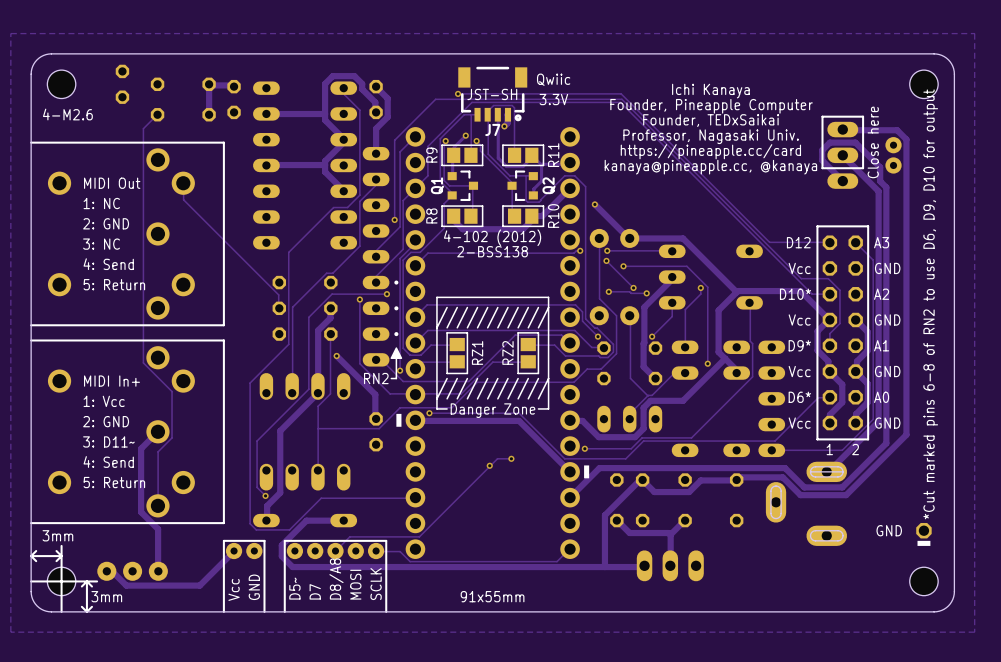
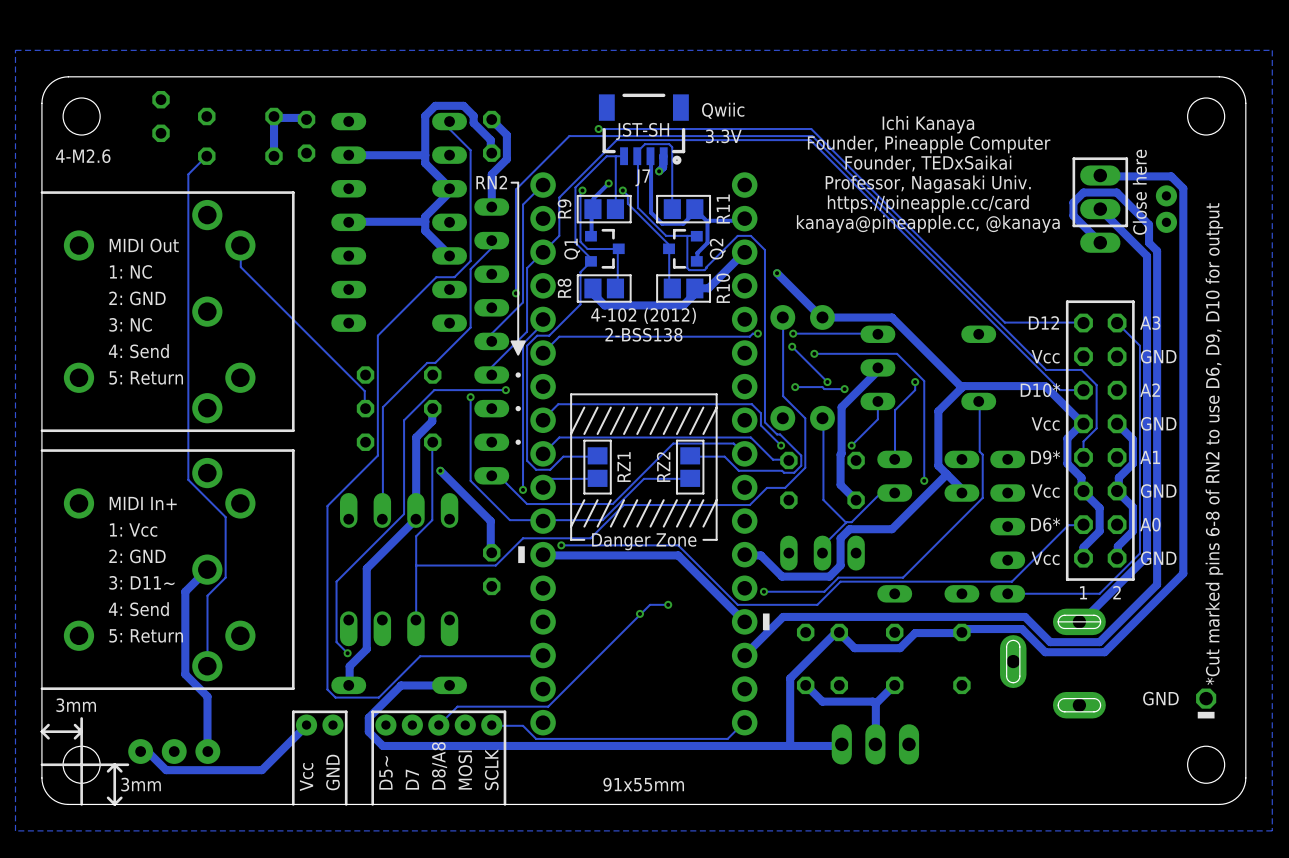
line: none -> (511, 182) (518, 182) (518, 341)
drawing: none -> [510, 340, 526, 356]
drawing: [390, 347, 403, 360] -> none
line: (396, 358) (396, 378) (391, 378) -> none
text position: RN2 (376, 378) -> RN2 (491, 182)

